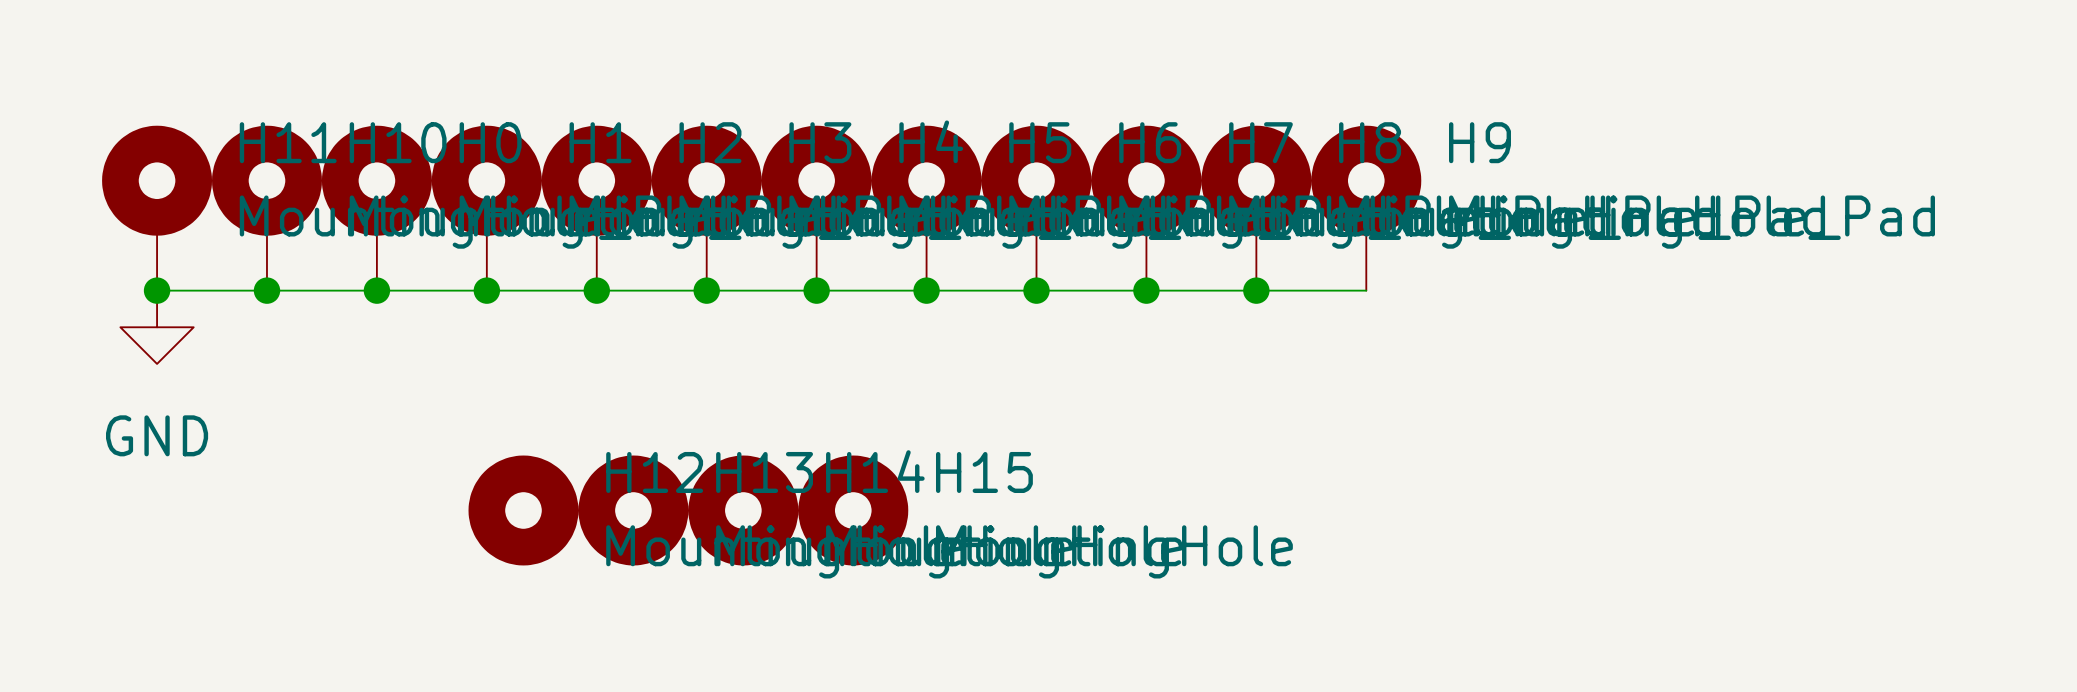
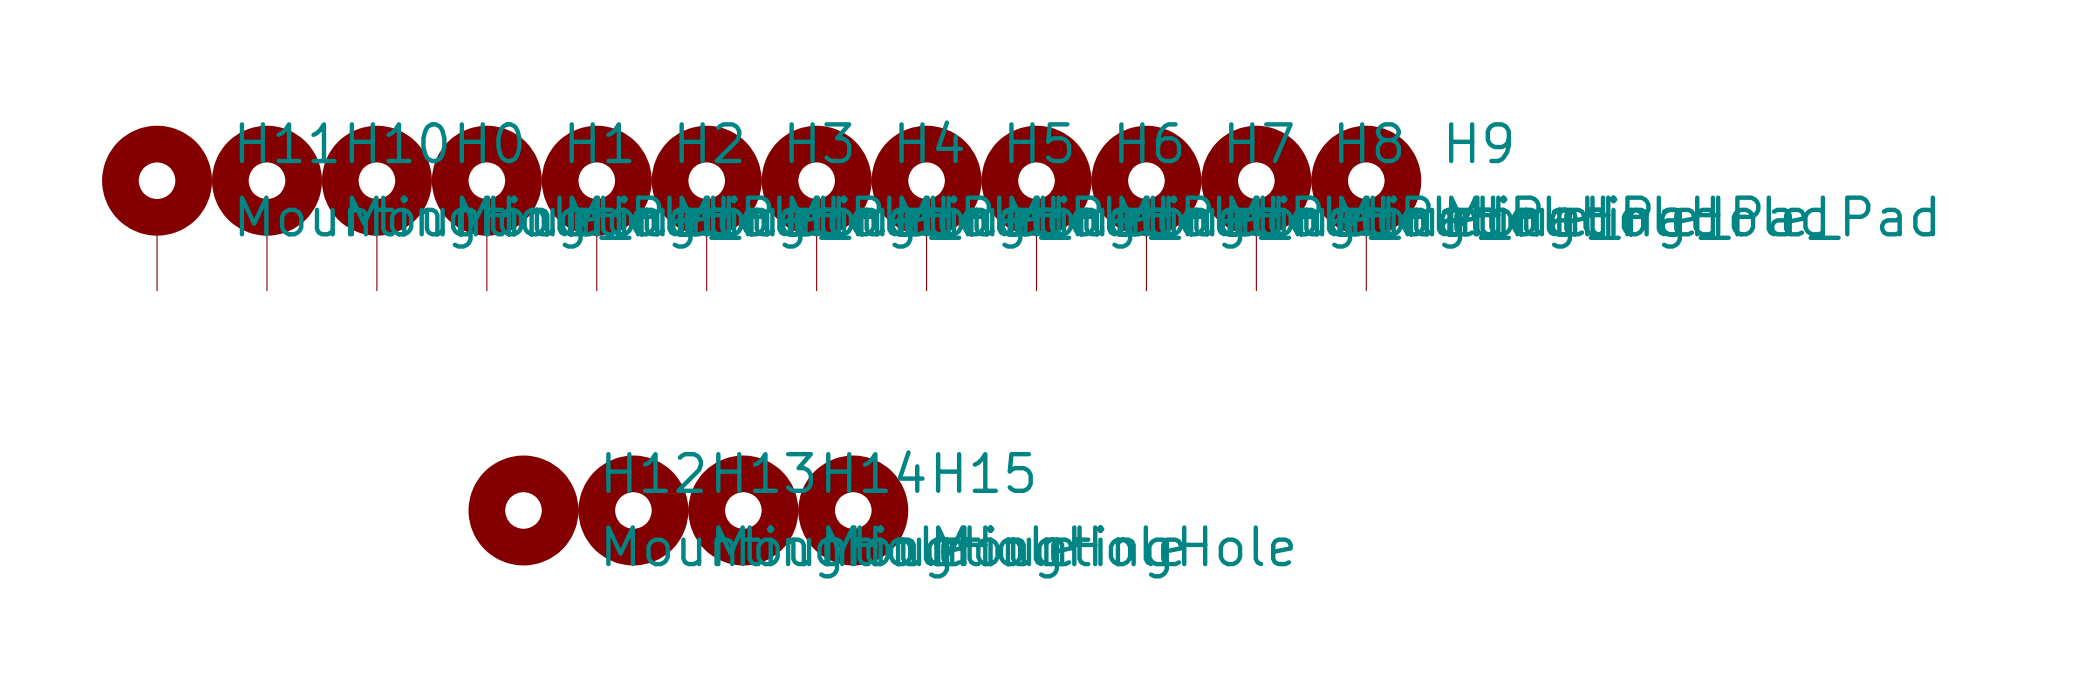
wire: (157, 290) (1366, 290) -> none
junction: (157, 290) -> none
junction: (266, 290) -> none
junction: (376, 290) -> none
junction: (486, 290) -> none
junction: (596, 290) -> none
junction: (706, 290) -> none
junction: (816, 290) -> none
junction: (926, 290) -> none
junction: (1036, 290) -> none
junction: (1146, 290) -> none
junction: (1256, 290) -> none
power symbol: GND (157, 327) -> none

